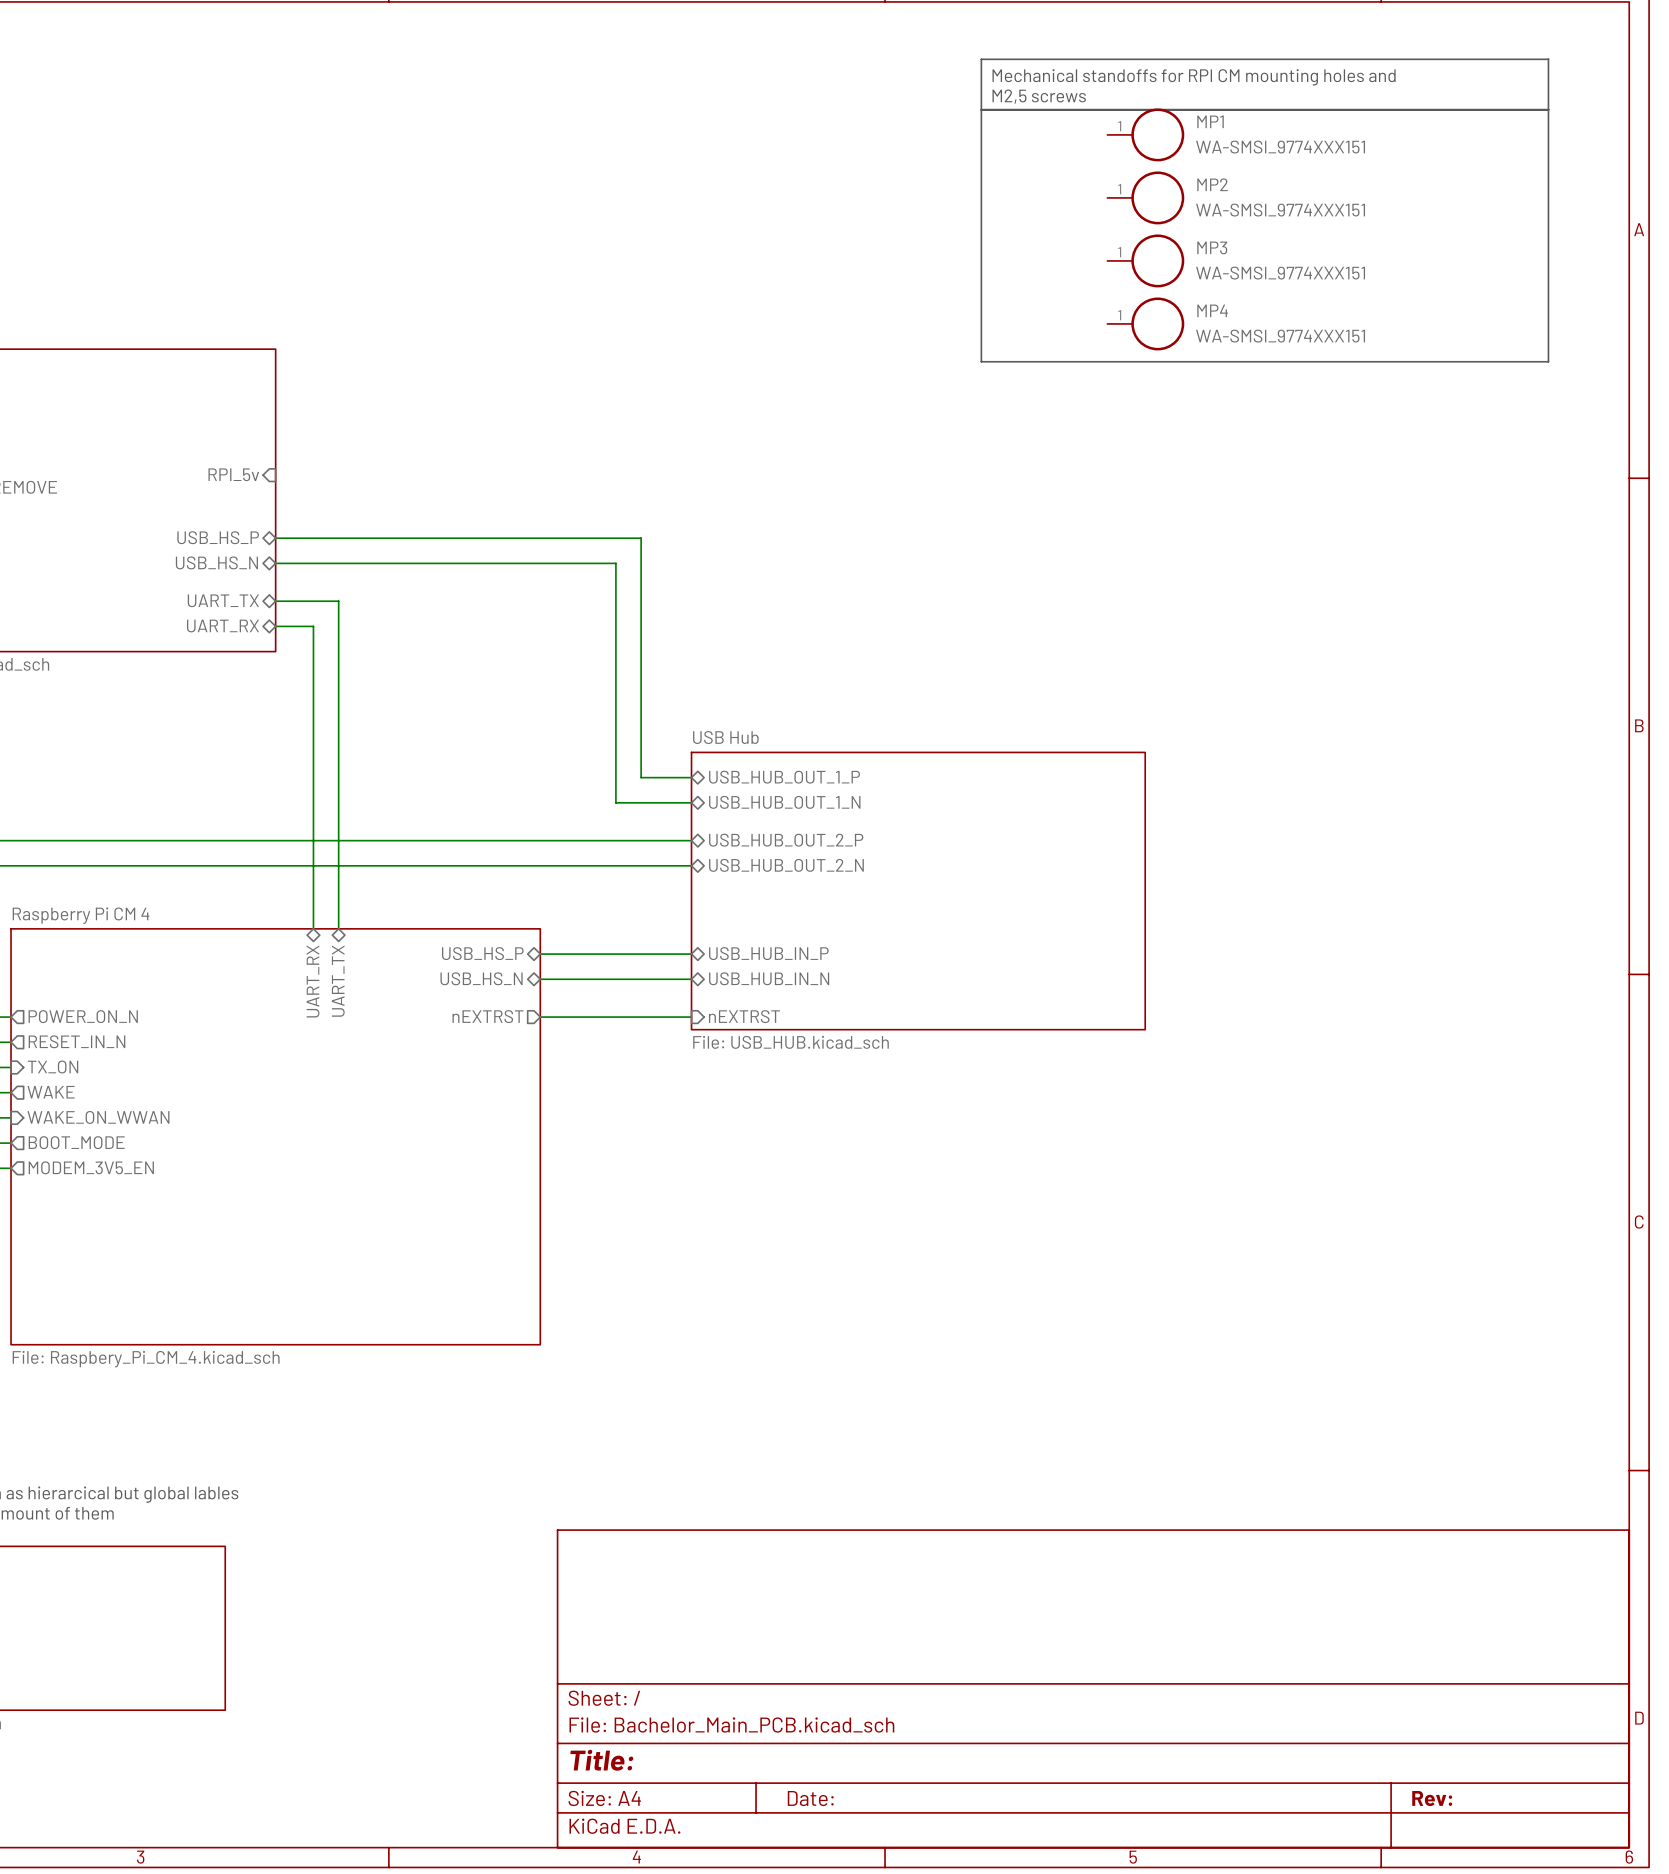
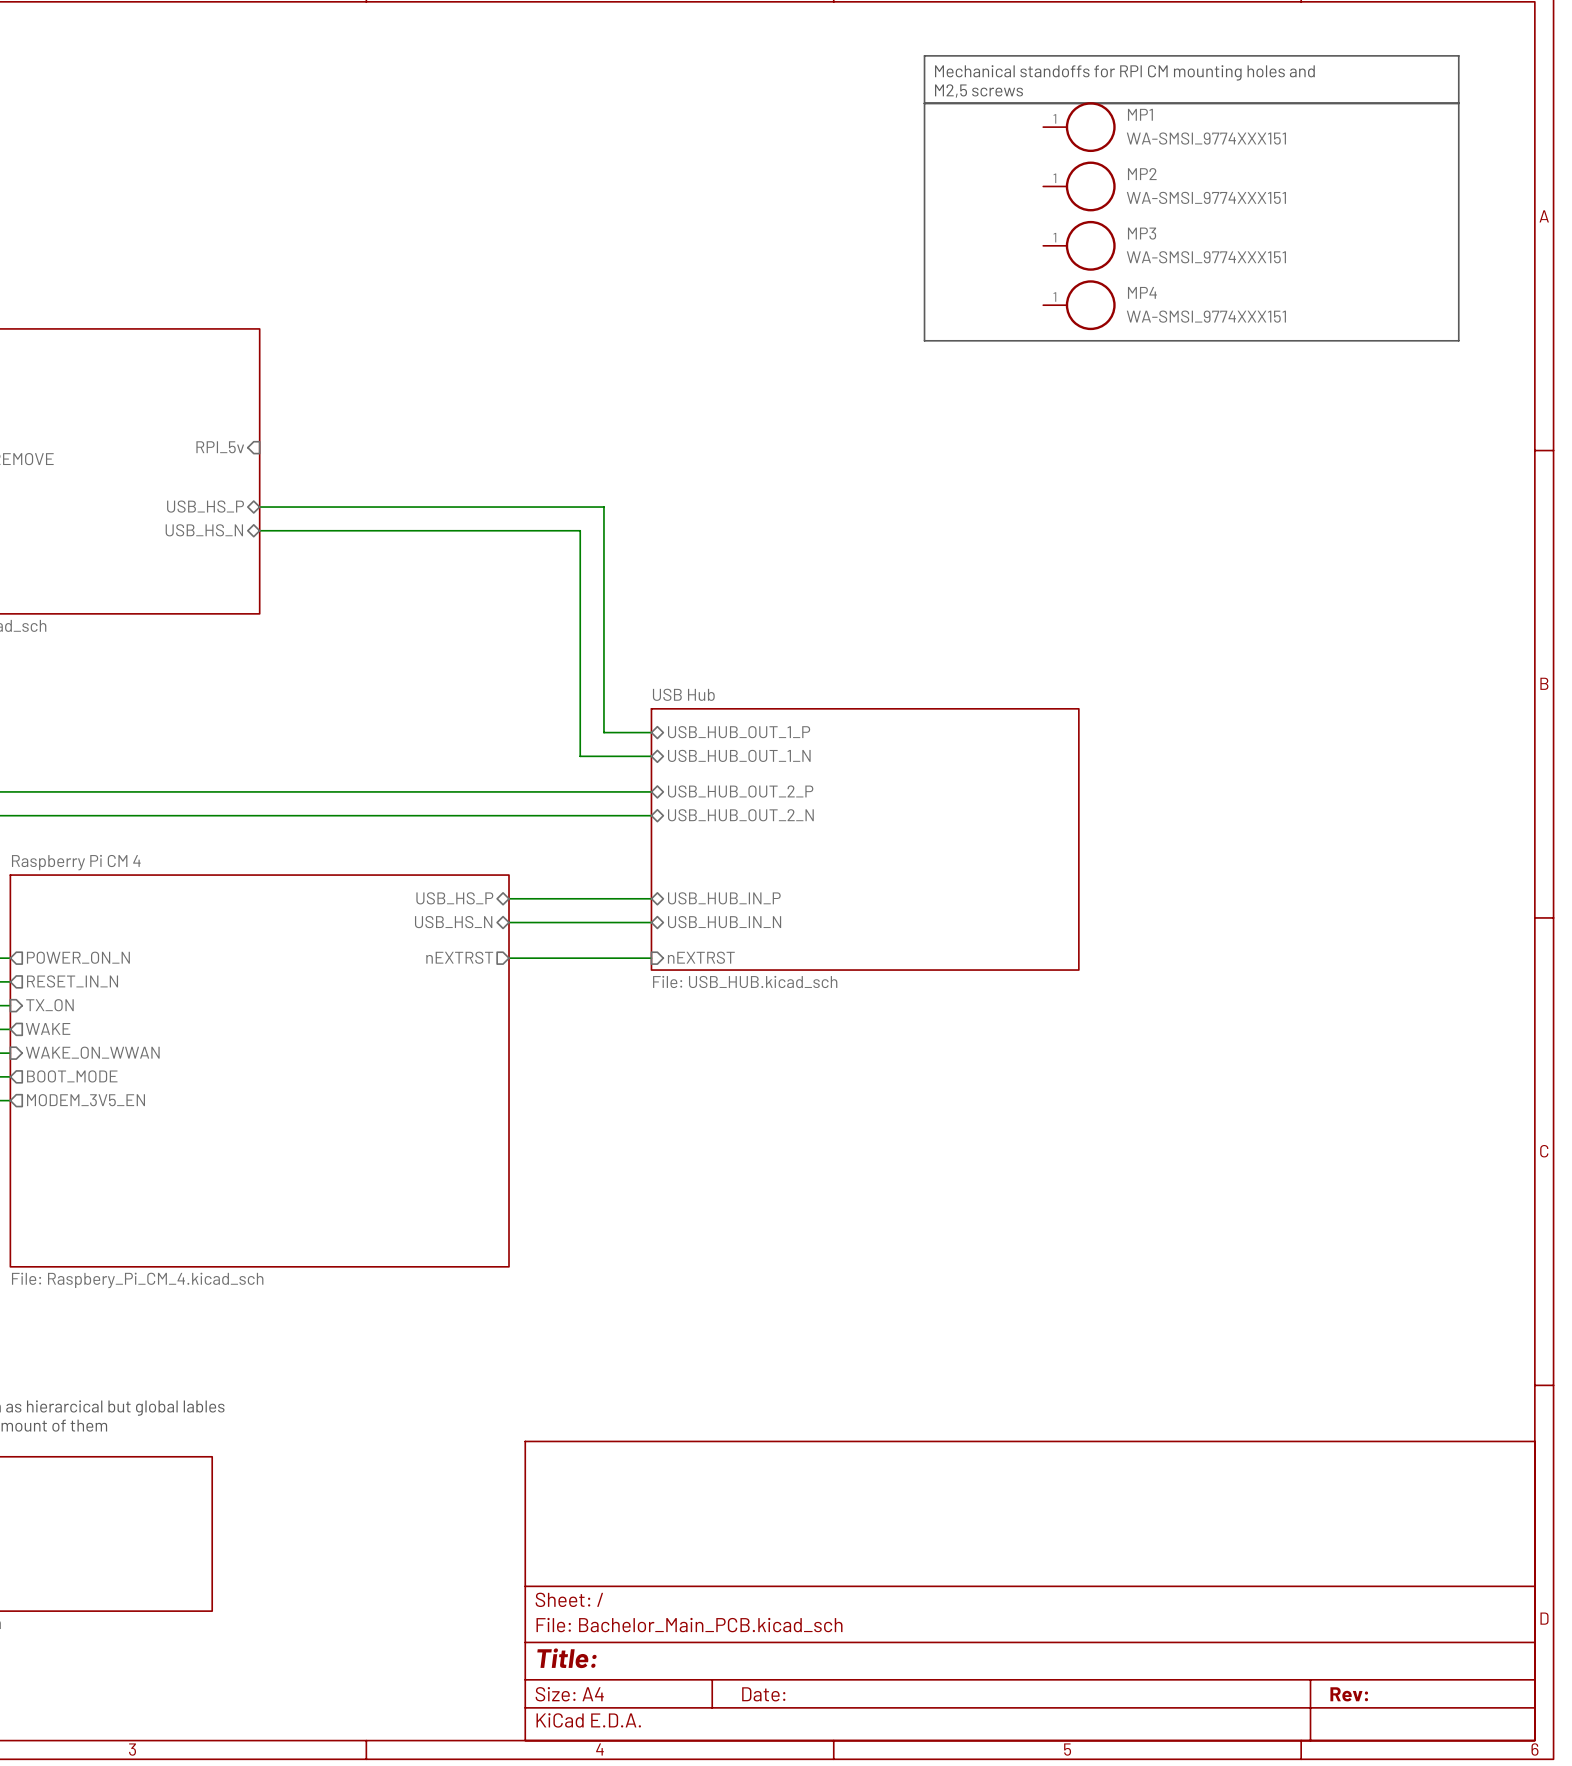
sheet pin: UART_TX (223, 600) -> none
wire: (275, 601) (338, 601) (338, 928) -> none
sheet pin: UART_RX (222, 626) -> none
wire: (275, 626) (313, 626) (313, 928) -> none
sheet pin: UART_RX (313, 981) -> none
sheet pin: UART_TX (338, 981) -> none

